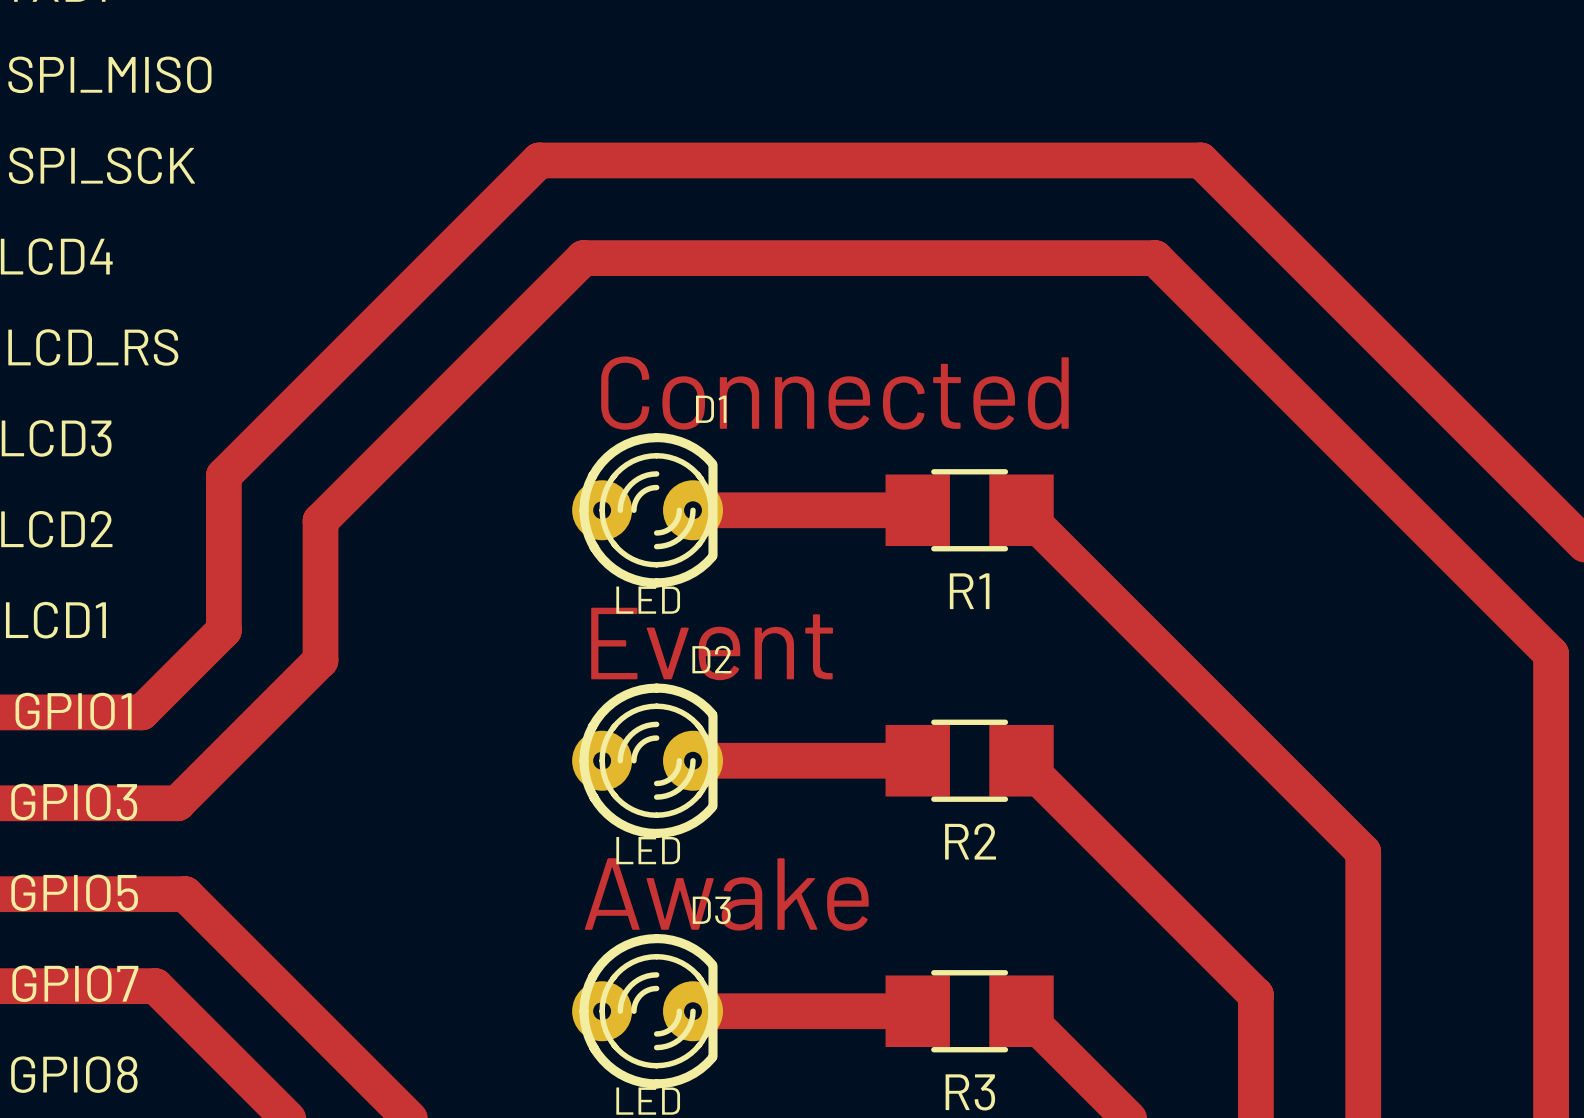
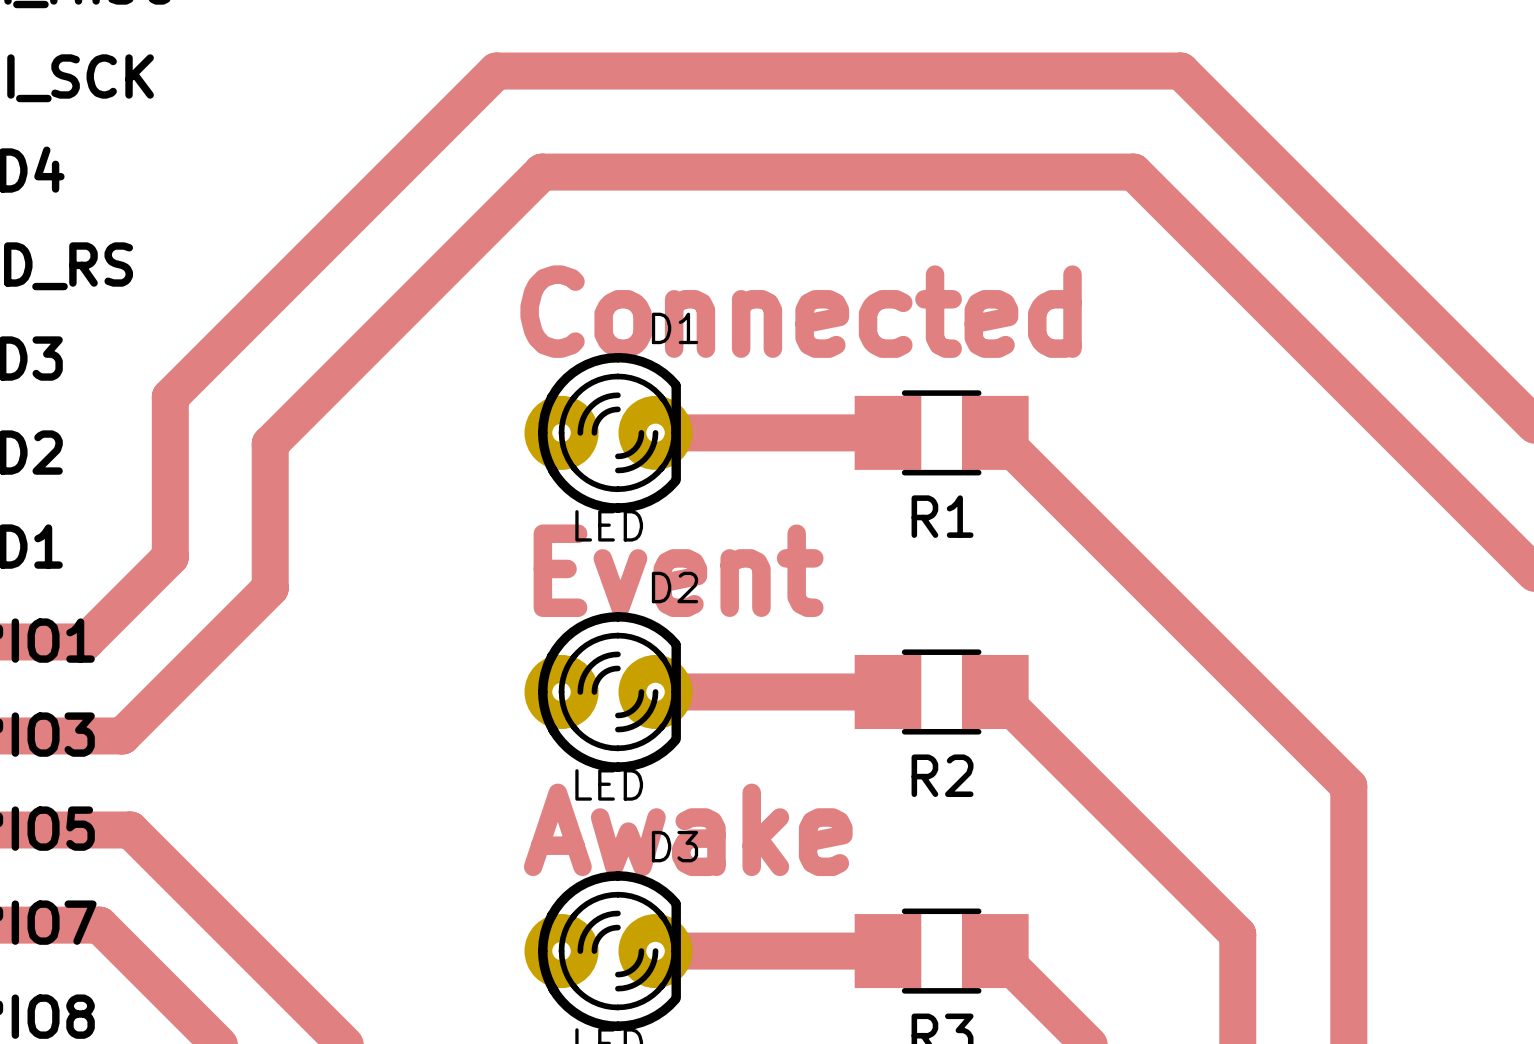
D1 footprint: [572, 433, 724, 588] -> [524, 352, 693, 513]
D2 footprint: [572, 683, 724, 839] -> [524, 612, 693, 772]
D3 footprint: [572, 933, 724, 1089] -> [524, 871, 693, 1031]

